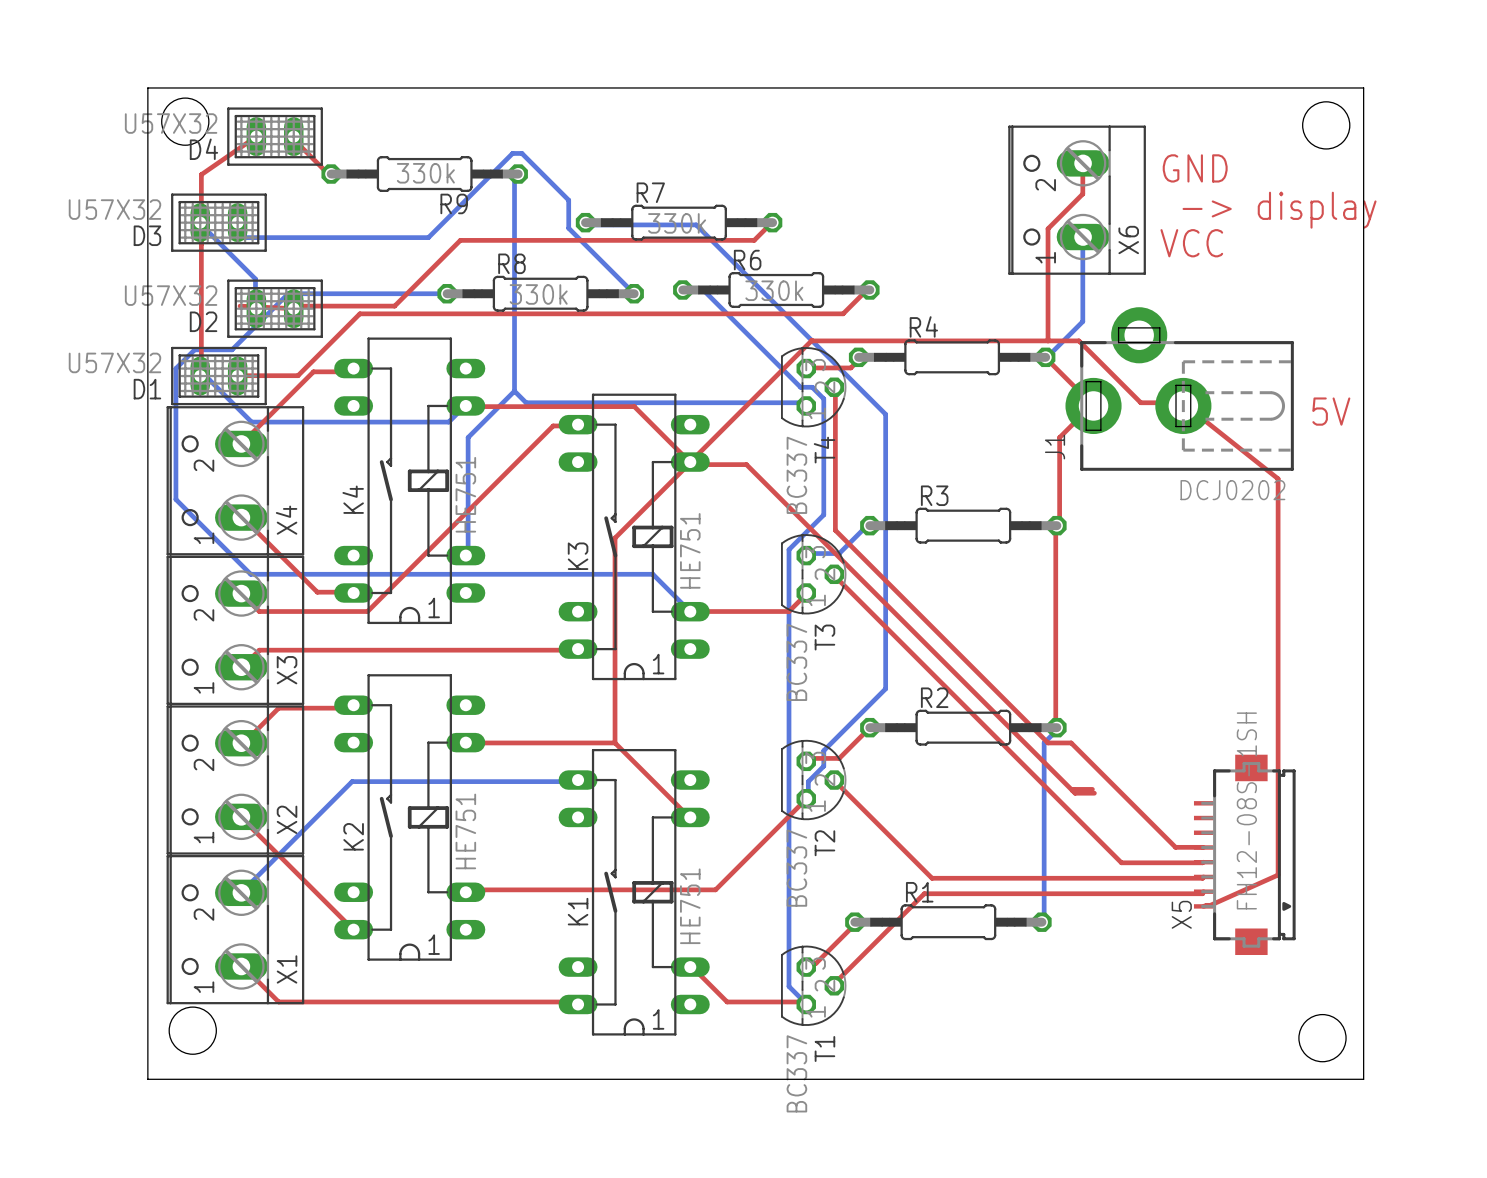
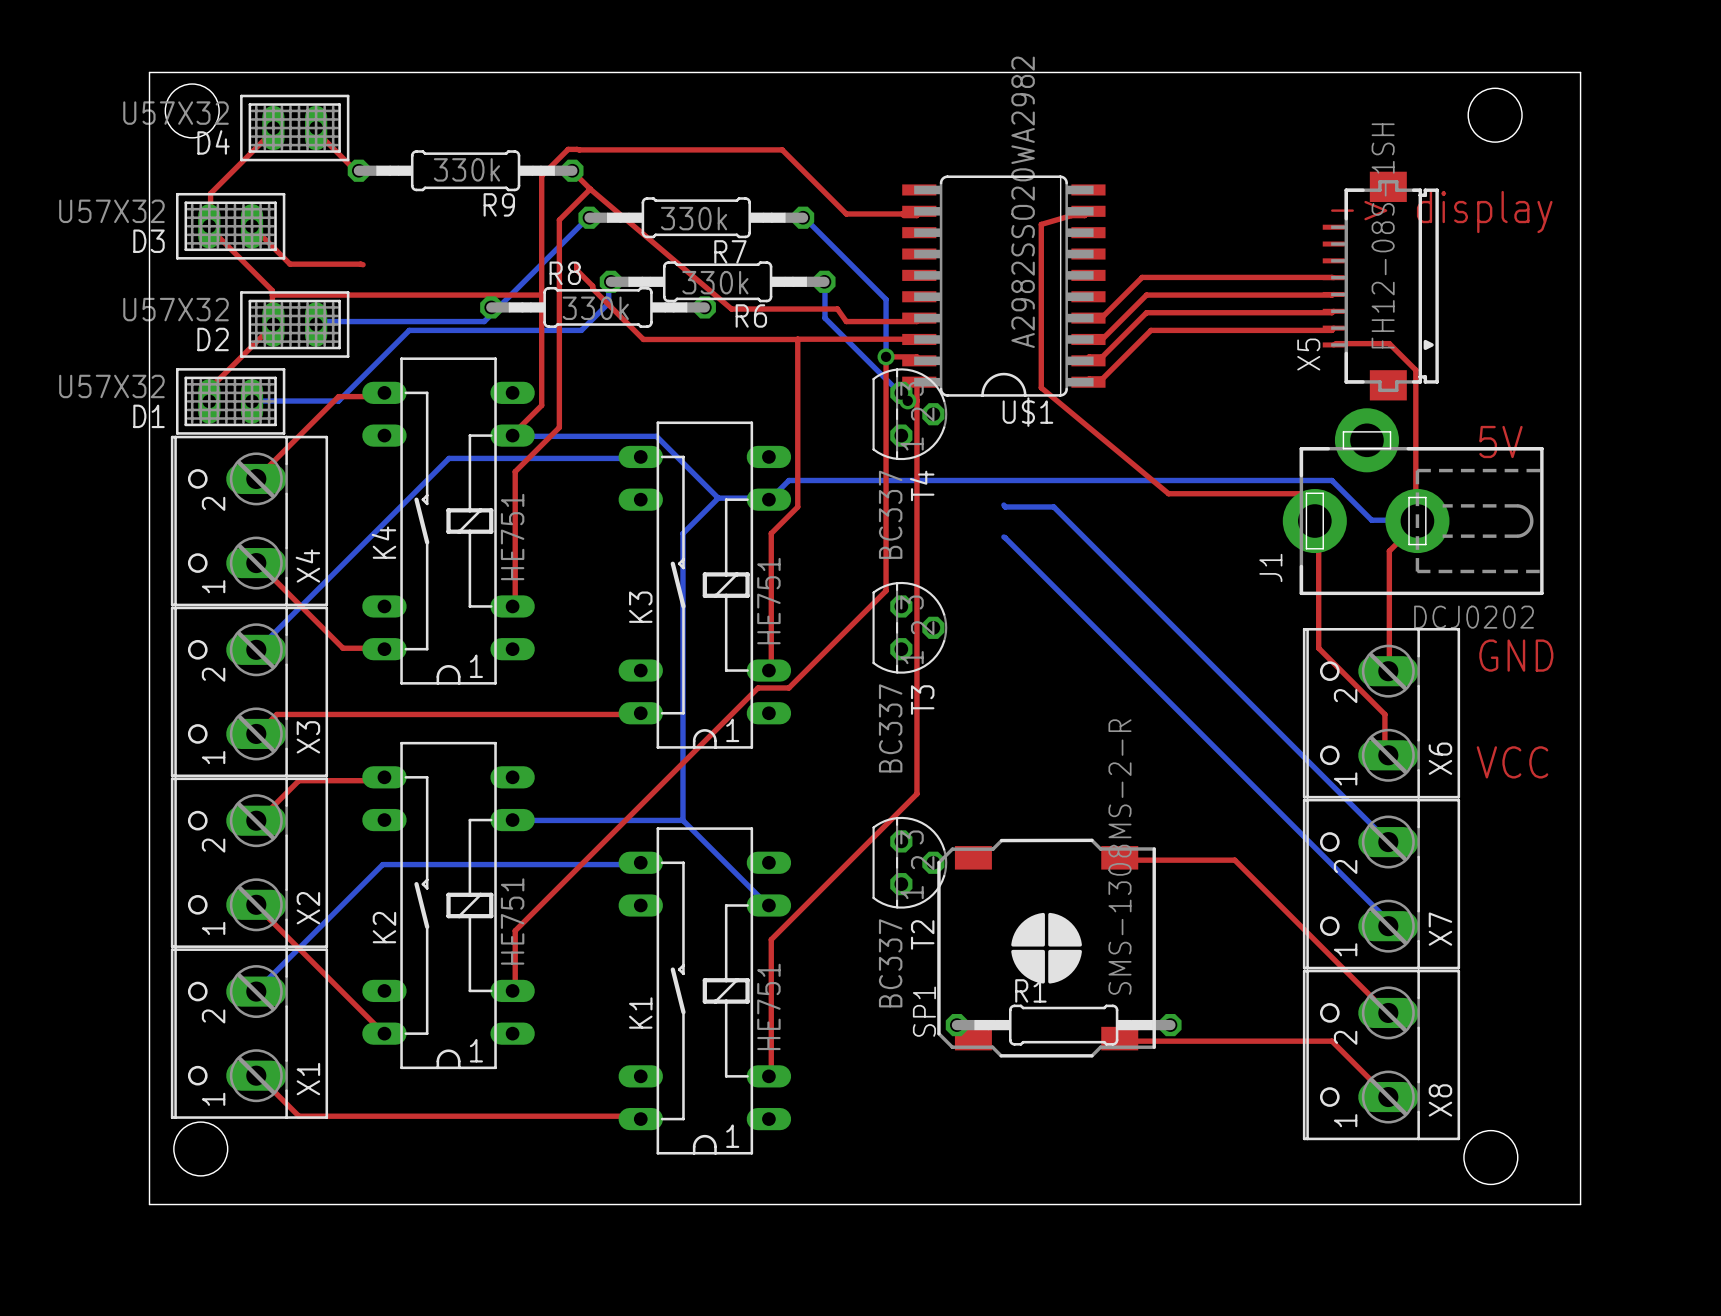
board edge: (1363, 87) (1363, 1079) -> (1537, 72) (1580, 72) (1580, 1204) (1537, 1204)
top track: (256, 136) (201, 174) (201, 193) -> (273, 128) (272, 131) (210, 193)
top track: (1083, 163) (1082, 193) (1048, 228) (1048, 340) -> none
text: GND (1195, 168) -> none
top track: none -> (572, 170) (590, 189)
bottom track: (518, 174) (514, 174) (514, 391) -> none
top track: none -> (590, 189) (731, 309) (837, 309) (846, 321) (916, 321) (919, 318)
top track: none -> (590, 189) (559, 220) (559, 427) (515, 471) (515, 604) (512, 606)
R7 name position: R7 (650, 192) -> R7 (730, 251)
X6 position: (1077, 200) -> (1381, 713)
top track: none -> (1088, 211) (1084, 215) (1071, 215) (1041, 224) (1041, 387) (1168, 493) (1301, 493) (1314, 506) (1314, 520) (1318, 524) (1318, 648) (1384, 714) (1384, 754) (1388, 755)
bottom track: none -> (589, 217) (484, 321) (316, 321) (316, 324)
bottom track: none -> (803, 217) (886, 299) (886, 356)
top track: (201, 221) (201, 364) -> (210, 224) (210, 228) (272, 290) (273, 324) (210, 387)
bottom track: (200, 222) (255, 279) (256, 308) -> none
top track: none -> (252, 226) (290, 264) (363, 264)
bottom track: (237, 222) (241, 237) (428, 237) (512, 153) (521, 153) (568, 200) (568, 228) (634, 293) -> none
bottom track: (585, 222) (587, 224) (696, 224) (885, 414) (885, 688) (823, 750) (823, 766) (808, 781) (808, 797) (806, 798) -> none
R7 position: (679, 222) -> (696, 217)
top track: (772, 222) (754, 240) (460, 240) (394, 306) (294, 306) (293, 308) (240, 306) -> none
bottom track: (1083, 237) (1082, 321) (1045, 357) -> none
text: VCC (1191, 243) -> none
top track: none -> (577, 268) (576, 264) (576, 270) (592, 286) (592, 288) (643, 339) (797, 339)
R6 name position: R6 (747, 260) -> R6 (751, 315)
top track: none -> (1333, 277) (1142, 277) (1102, 317) (1088, 318)
bottom track: none -> (610, 281) (608, 283) (607, 303) (581, 330) (409, 330) (338, 401) (252, 401)
bottom track: none -> (824, 281) (824, 318) (907, 400)
U$1: none -> A2982SSO20WA2982 (1003, 286)
top track: none -> (272, 295) (541, 295)
top track: none -> (1333, 294) (1146, 295) (1102, 339) (1088, 339)
bottom track: (682, 289) (703, 290) (800, 387) (812, 387) (823, 398) (823, 514) (789, 549) (789, 986) (806, 1004) -> none
R6 position: (776, 289) -> (717, 281)
top track: (869, 289) (866, 290) (843, 313) (359, 313) (298, 375) (237, 376) -> none
bottom track: (447, 293) (288, 293) (232, 349) (194, 349) (175, 368) (175, 499) (250, 574) (652, 574) (690, 611) -> none
top track: none -> (1333, 311) (1146, 312) (1102, 356) (1089, 356) (1088, 360)
top track: none -> (1333, 328) (1331, 330) (1150, 330) (1102, 378) (1089, 378) (1088, 382)
top track: none -> (1333, 344) (1389, 343) (1415, 370) (1415, 520) (1417, 521) (1389, 551) (1388, 671)
via: none -> (886, 356)
top track: (858, 357) (858, 360) (850, 367) (806, 368) -> none
R4: (952, 357) -> none
top track: (1045, 357) (1090, 402) -> none
via: none -> (907, 400)
bottom track: (200, 376) (201, 379) (209, 379) (251, 422) (448, 422) (465, 405) -> (718, 498) (656, 436) (512, 435)
top track: (834, 387) (835, 530) (1048, 742) (1071, 742) (1175, 847) (1203, 847) -> none
J1 position: (1179, 388) -> (1413, 501)
bottom track: (514, 391) (468, 437) (468, 553) (465, 555) -> none
bottom track: (514, 391) (526, 402) (804, 402) (806, 405) -> none
top track: (465, 405) (634, 406) (690, 462) -> (512, 435) (541, 405) (541, 175) (568, 149) (782, 149) (846, 213) (902, 213) (919, 211) (916, 215) (903, 215)
top track: (1092, 405) (1059, 437) (1059, 522) (1055, 526) (1056, 727) -> none
top track: (578, 424) (553, 425) (367, 611) (259, 611) (241, 593) -> none
bottom track: none -> (640, 456) (448, 458) (256, 649)
bottom track: none -> (718, 498) (768, 499) (788, 480) (1331, 480) (1371, 520) (1417, 521)
bottom track: none -> (718, 498) (682, 533) (682, 820)
top track: (690, 462) (692, 464) (746, 464) (1075, 793) (1094, 793) -> none
top track: (690, 462) (615, 538) (615, 742) -> none
top track: (690, 462) (811, 340) (1078, 340) (1140, 402) (1183, 402) (1183, 405) (1187, 406) (1278, 478) (1278, 875) (1210, 905) (1203, 906) -> none
bottom track: none -> (1003, 505) (1005, 506) (1053, 506) (1388, 842)
bottom track: none -> (1003, 537) (1389, 921) (1388, 926)
bottom track: (869, 525) (866, 526) (839, 553) (808, 553) (806, 555) -> none
R3: (963, 525) -> none
top track: (834, 574) (1121, 862) (1203, 862) -> none
top track: (806, 592) (789, 611) (692, 611) -> (919, 339) (797, 339) (797, 506) (771, 533) (771, 670)
text: none -> GND (1516, 655)
text: none -> VCC (1512, 762)
top track: (869, 727) (839, 758) (808, 758) (806, 761) -> none
R2: (963, 727) -> none
bottom track: (1056, 727) (1044, 742) (1044, 920) (1041, 922) -> none
top track: (465, 742) (615, 742) -> none
bottom track: none -> (512, 820) (682, 820)
top track: (615, 742) (690, 817) -> none
bottom track: none -> (682, 820) (768, 905)
top track: none -> (1119, 857) (1120, 860) (1234, 860) (1388, 1012)
top track: (834, 780) (932, 878) (1203, 876) -> none
top track: (1092, 789) (1072, 790) -> none
top track: (806, 798) (715, 889) (468, 889) -> (919, 360) (916, 356) (886, 356) (886, 590) (788, 687) (758, 687) (515, 930) (515, 988)
X7: none -> (1381, 884)
SP1: none -> SMS-1308MS-2-R (1046, 948)
X5 position: (1244, 854) -> (1380, 286)
top track: (1203, 891) (1202, 893) (924, 893) (834, 985) -> none
top track: (854, 922) (854, 924) (816, 963) (808, 963) (806, 967) -> none
top track: none -> (1119, 1038) (1120, 1041) (1331, 1041) (1388, 1097)
X8: none -> (1381, 1054)
top track: (690, 967) (727, 1001) (804, 1001) (806, 1004) -> (768, 1076) (771, 1072) (771, 939) (916, 793) (916, 383) (919, 382)
T1: BC337 (813, 985) -> none

